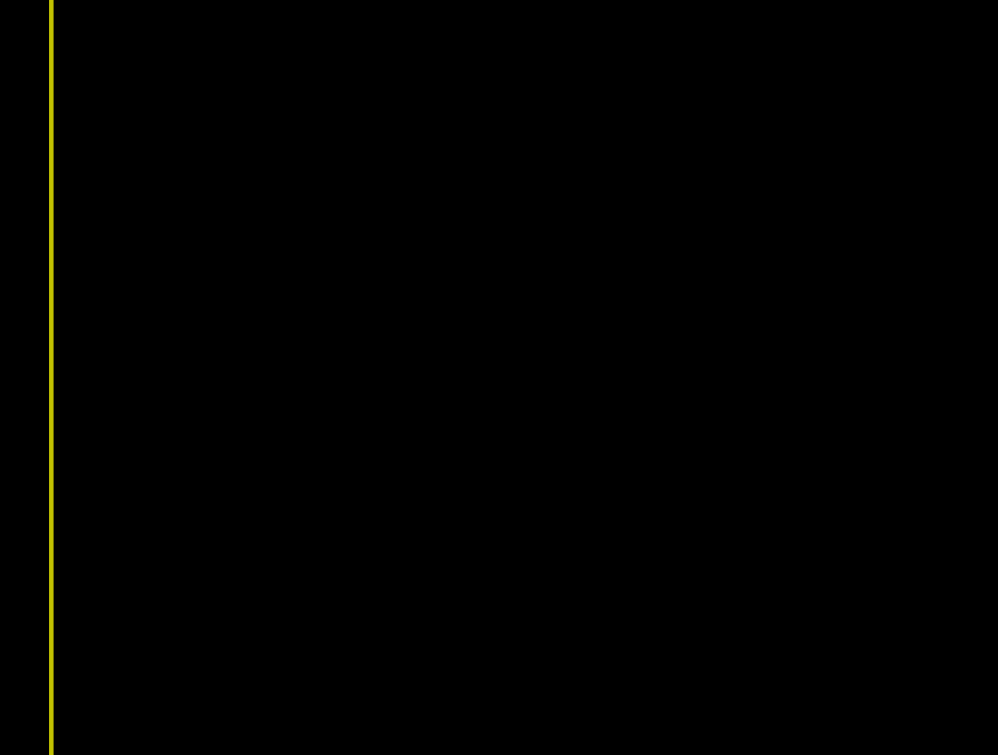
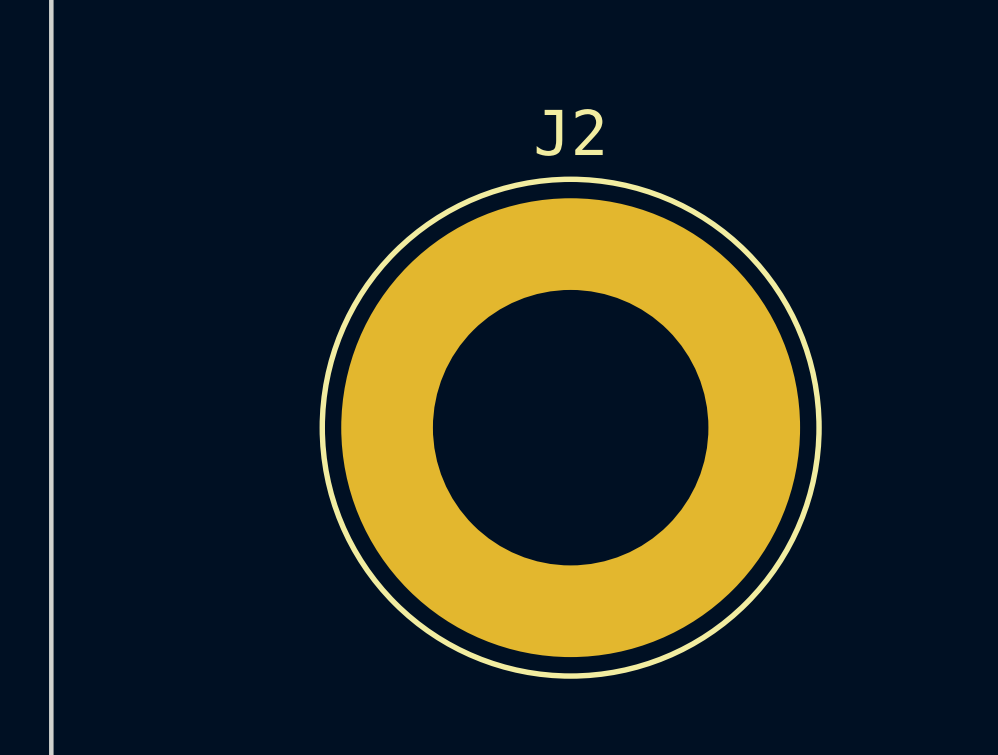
J2: none -> (570, 427)

